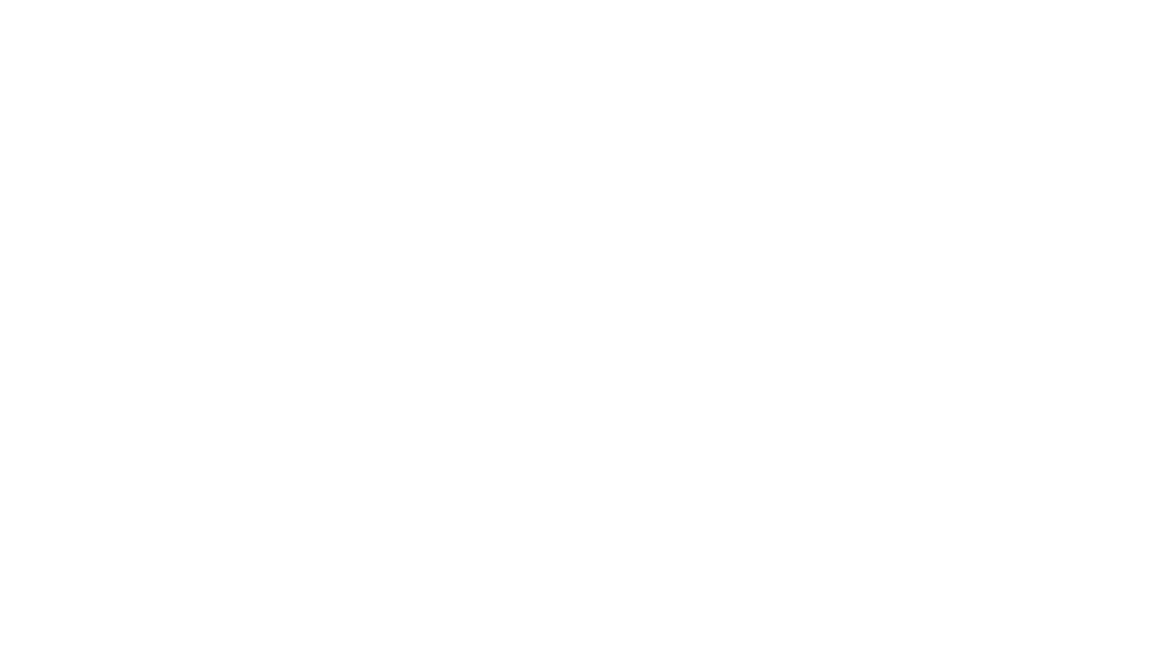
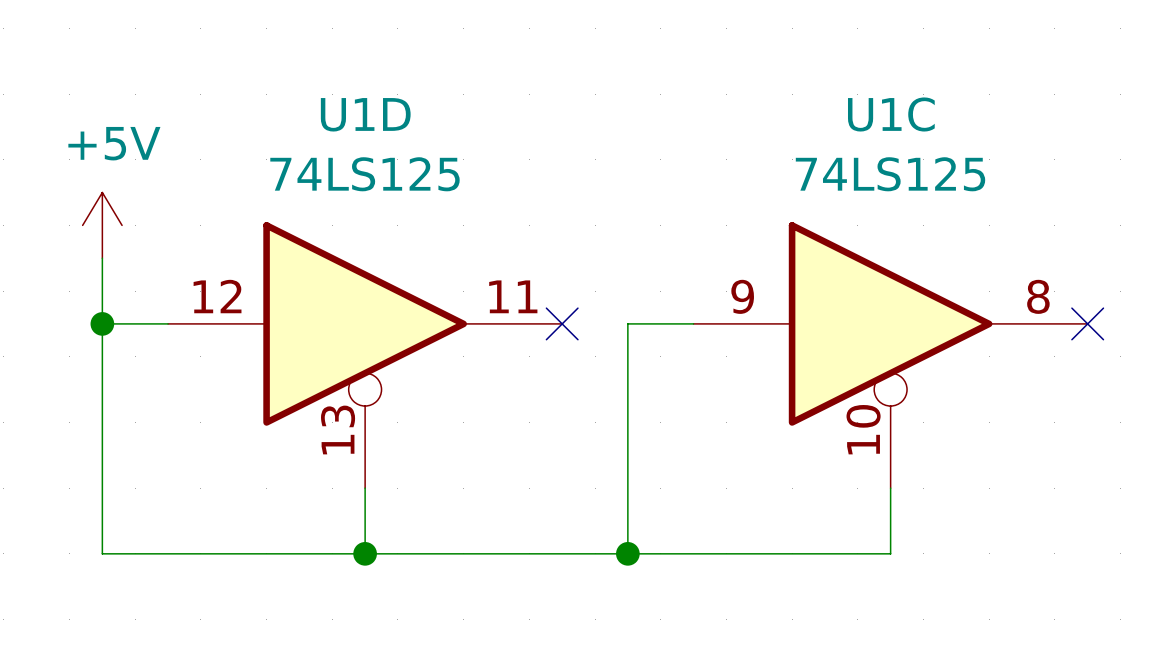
power symbol: none -> +5V (102, 225)
wire: none -> (102, 258) (102, 553) (890, 553) (890, 488)
wire: none -> (102, 323) (168, 323)
junction: none -> (102, 323)
no-connect mark: none -> (562, 323)
wire: none -> (693, 323) (627, 323) (627, 553)
no-connect mark: none -> (1087, 323)
U1D: none -> 74LS125 (365, 355)
U1C: none -> 74LS125 (890, 355)
wire: none -> (365, 488) (365, 553)
junction: none -> (365, 553)
junction: none -> (627, 553)

